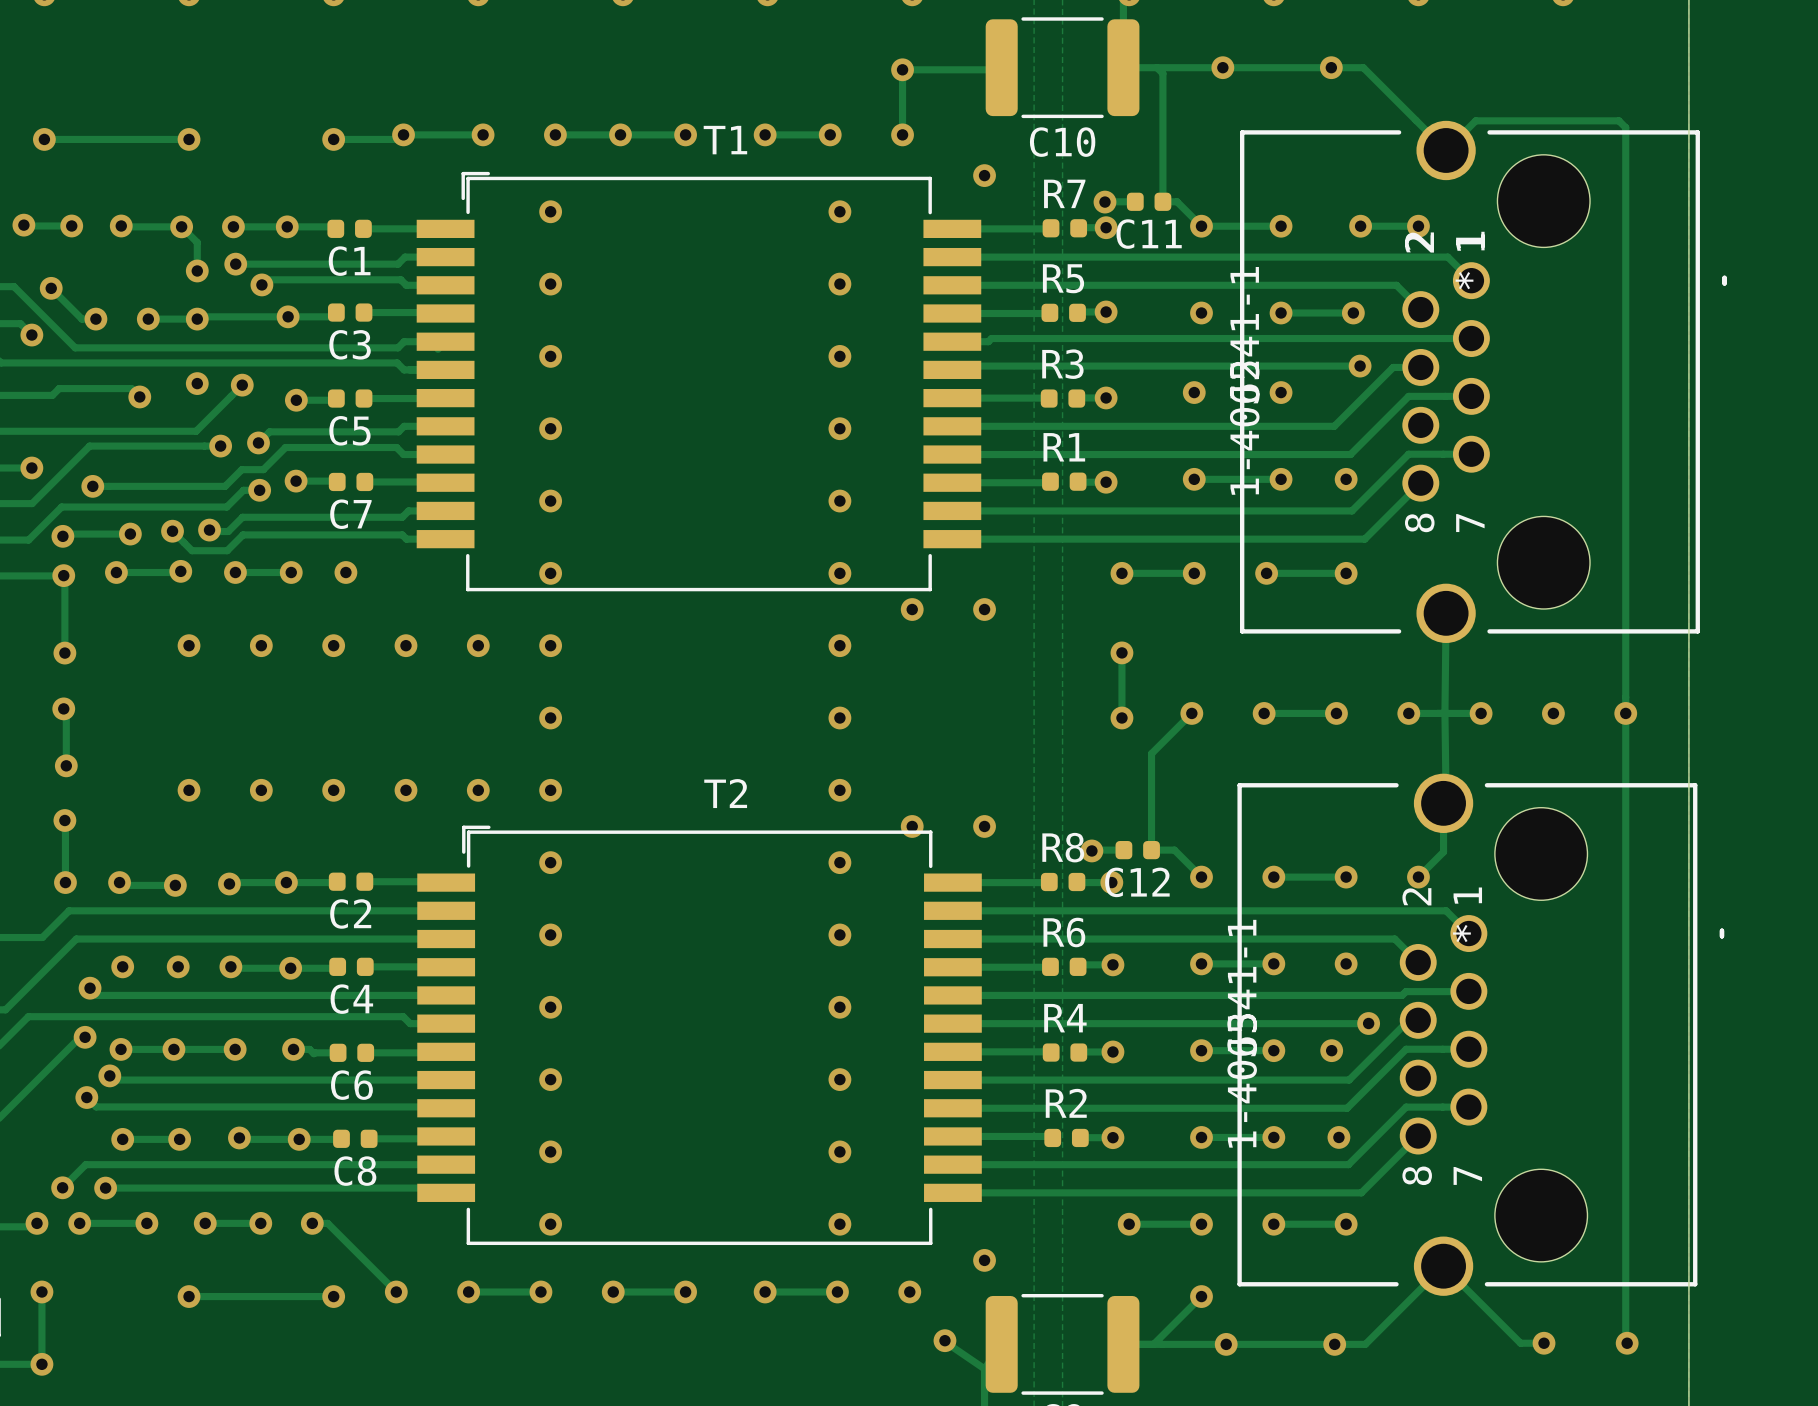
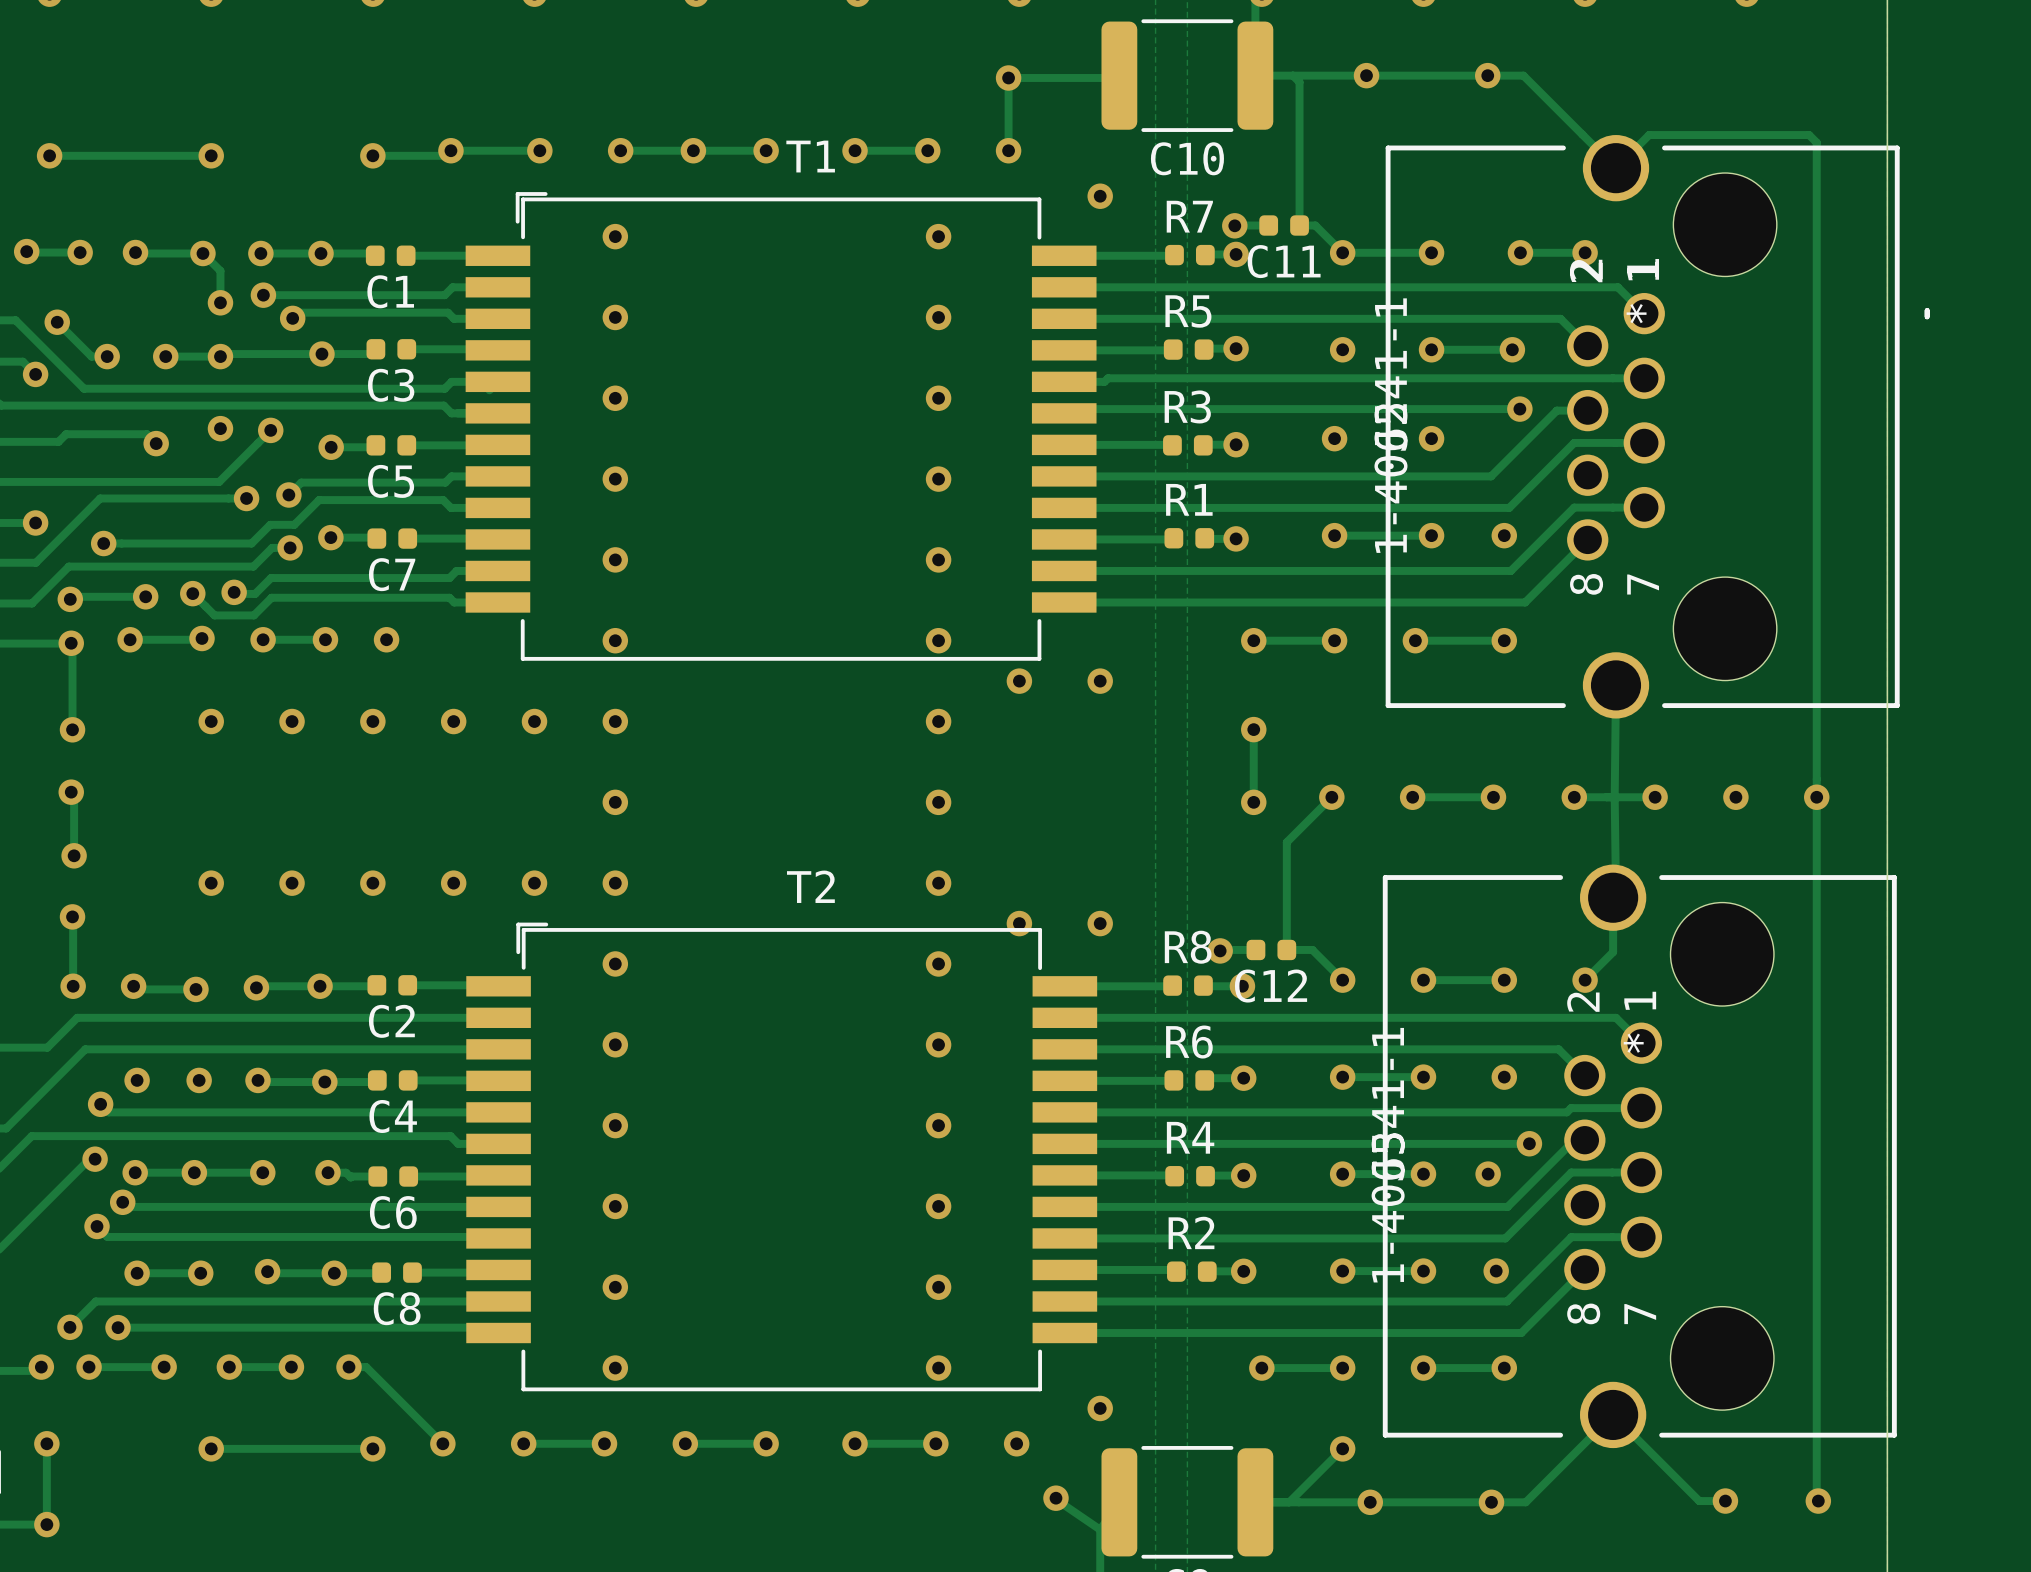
part footprint: [1237, 773, 1725, 1296] -> [1382, 864, 1927, 1449]

